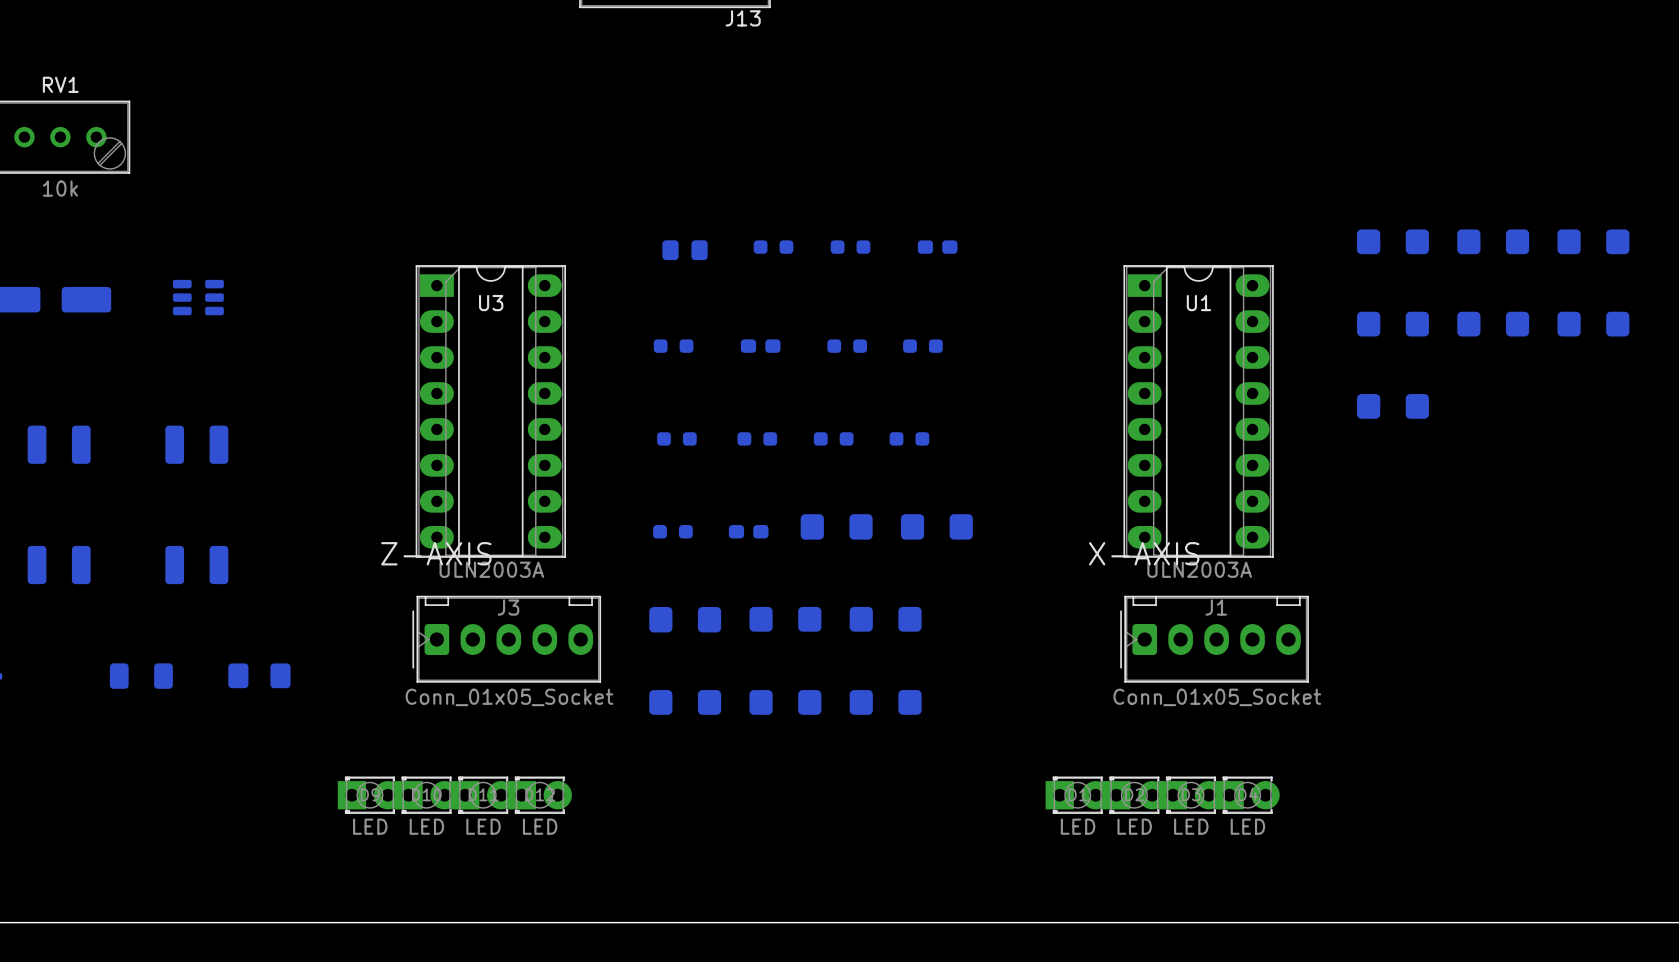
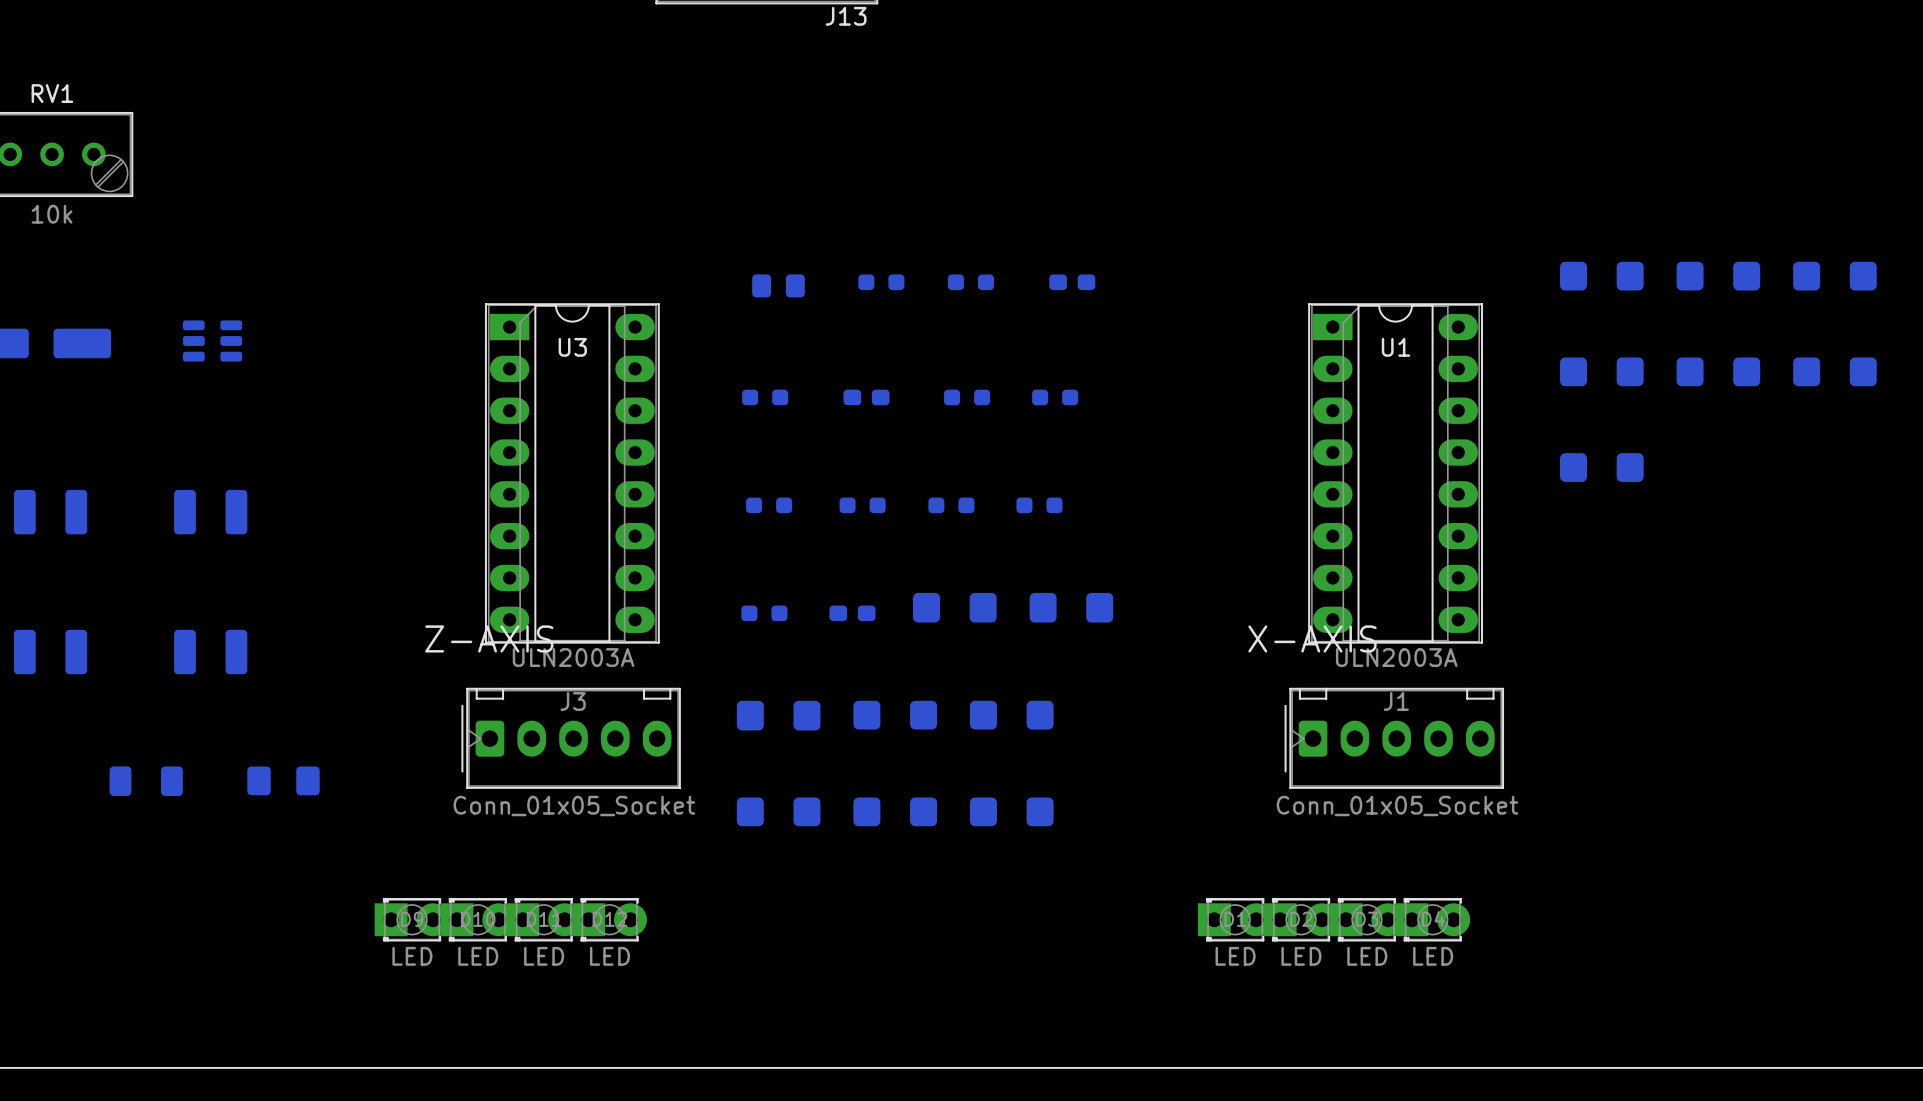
U3 position: (490, 411) -> (572, 473)
U1 position: (1198, 411) -> (1395, 473)

